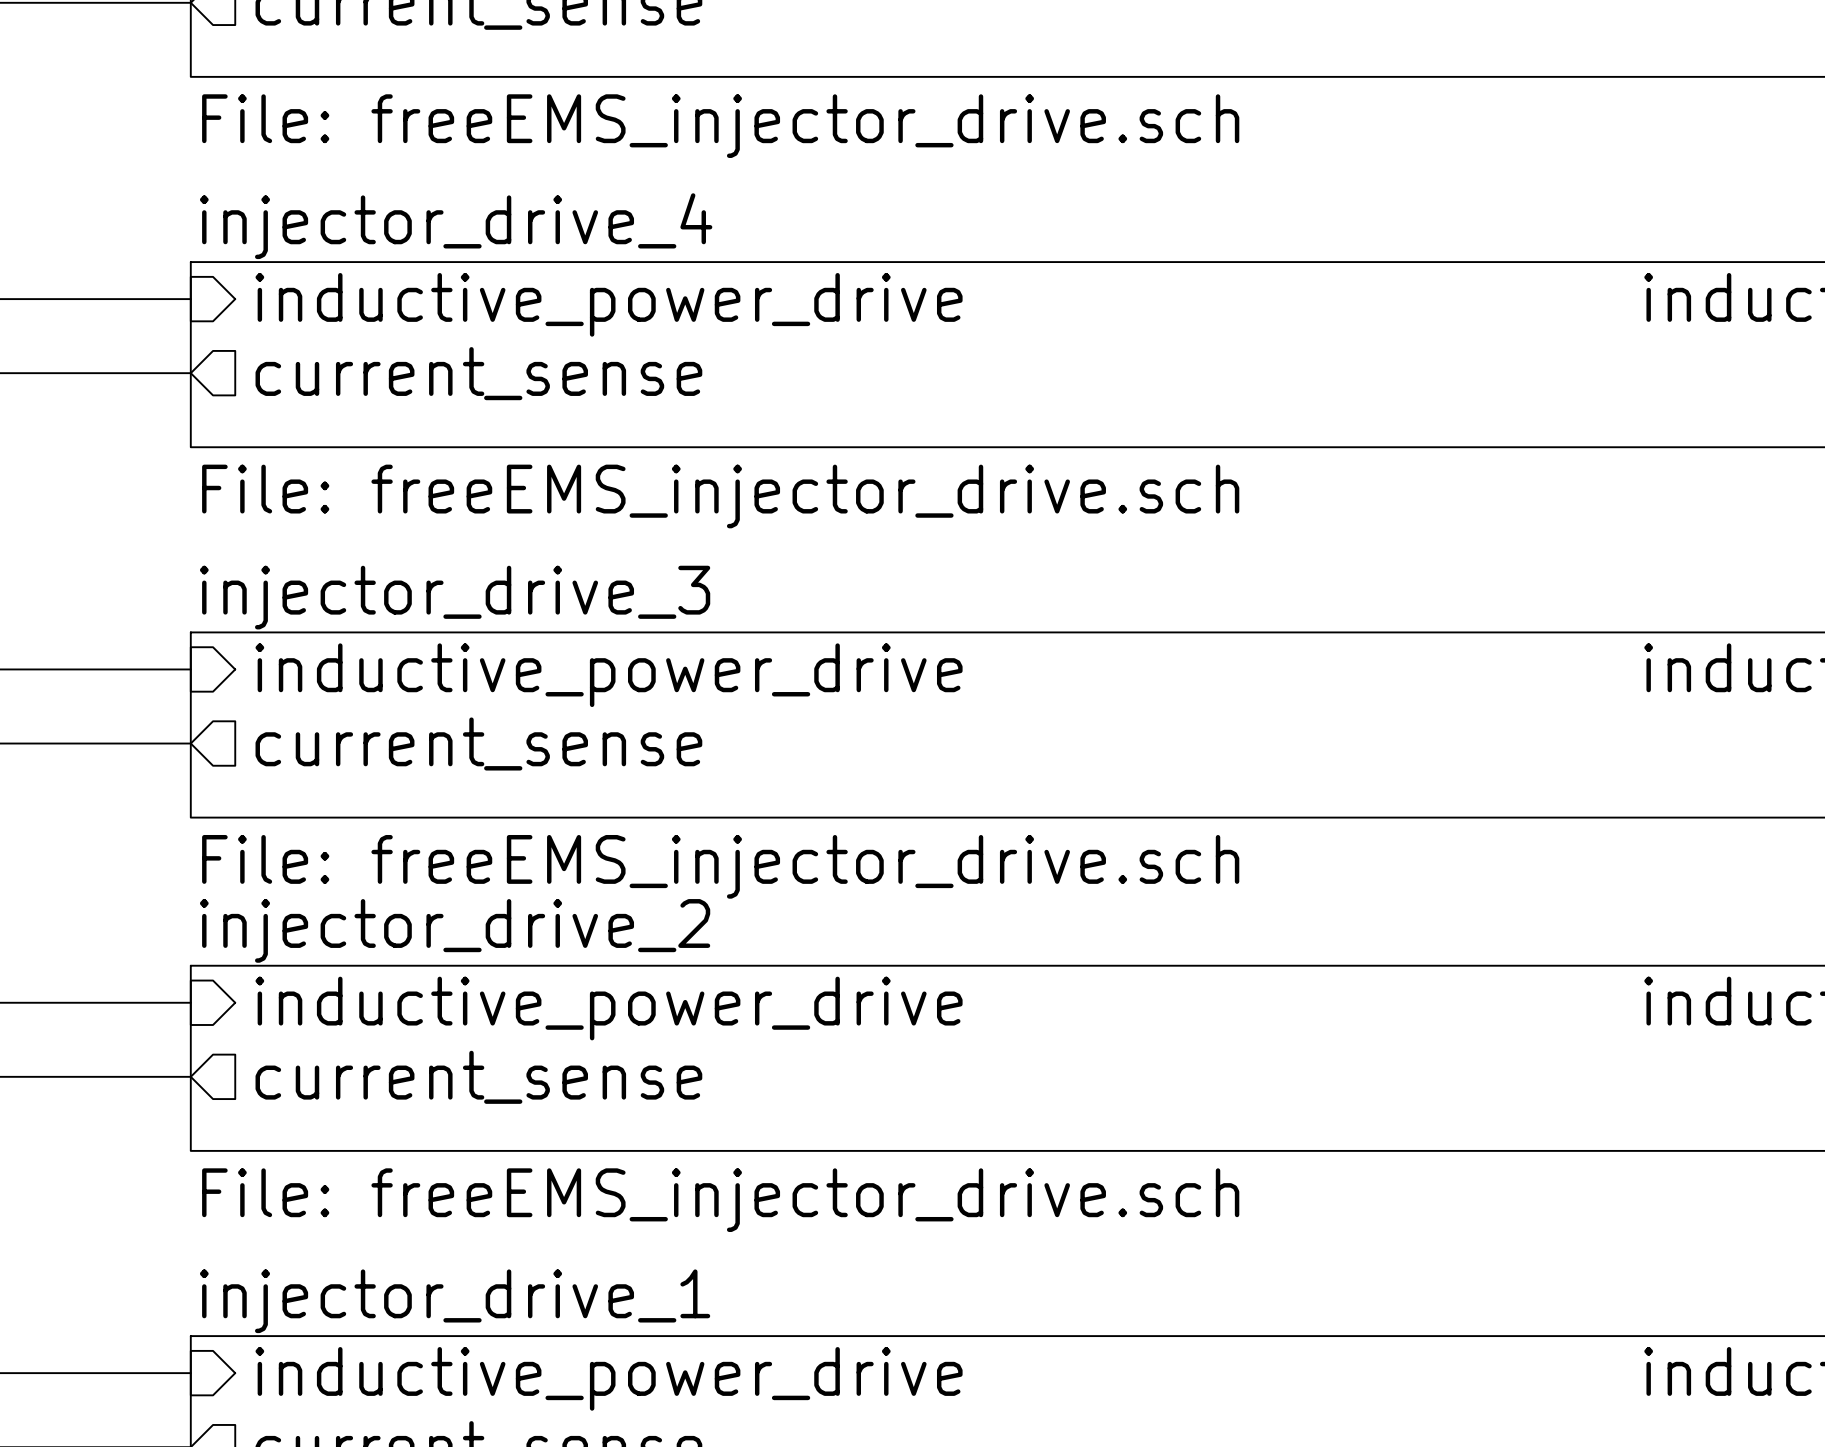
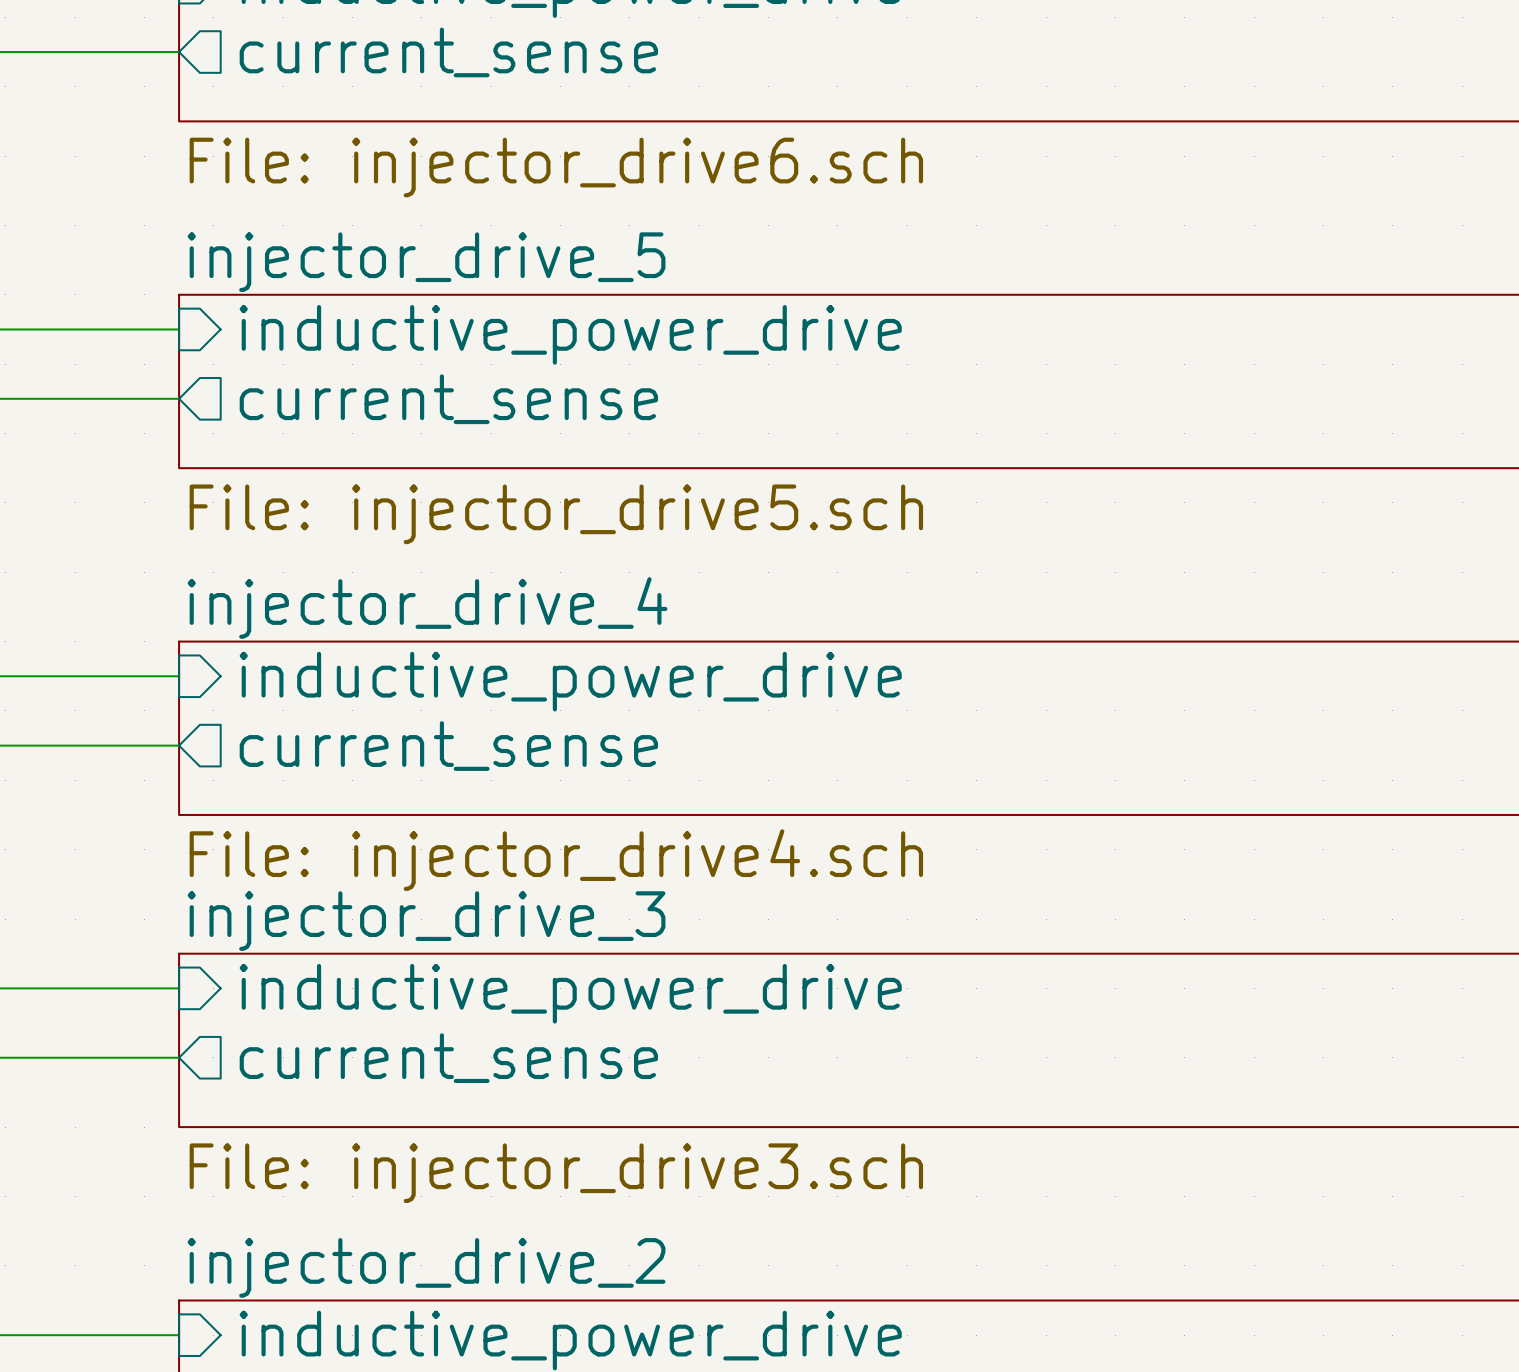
sheet value: File: freeEMS_injector_drive.sch (720, 126) -> File: injector_drive6.sch (556, 167)
sheet injector_drive_4 name: injector_drive_4 (456, 226) -> injector_drive_5 (426, 262)
sheet injector_drive_4 value: File: freeEMS_injector_drive.sch (720, 496) -> File: injector_drive5.sch (556, 514)
sheet injector_drive_3 name: injector_drive_3 (455, 597) -> injector_drive_4 (427, 607)
sheet injector_drive_3 value: File: freeEMS_injector_drive.sch (720, 866) -> File: injector_drive4.sch (556, 860)
sheet injector_drive_2 name: injector_drive_2 (455, 930) -> injector_drive_3 (426, 921)
sheet injector_drive_2 value: File: freeEMS_injector_drive.sch (720, 1200) -> File: injector_drive3.sch (556, 1173)
sheet injector_drive_1 name: injector_drive_1 (455, 1301) -> injector_drive_2 (426, 1267)

